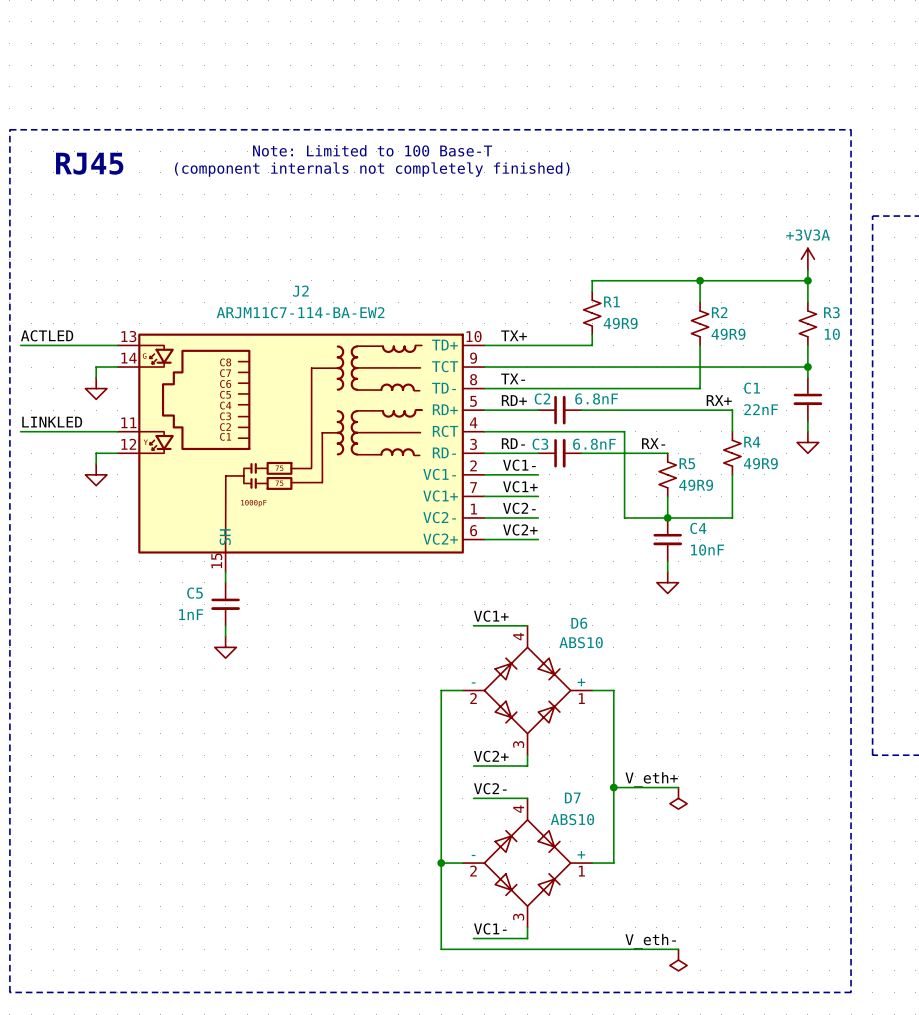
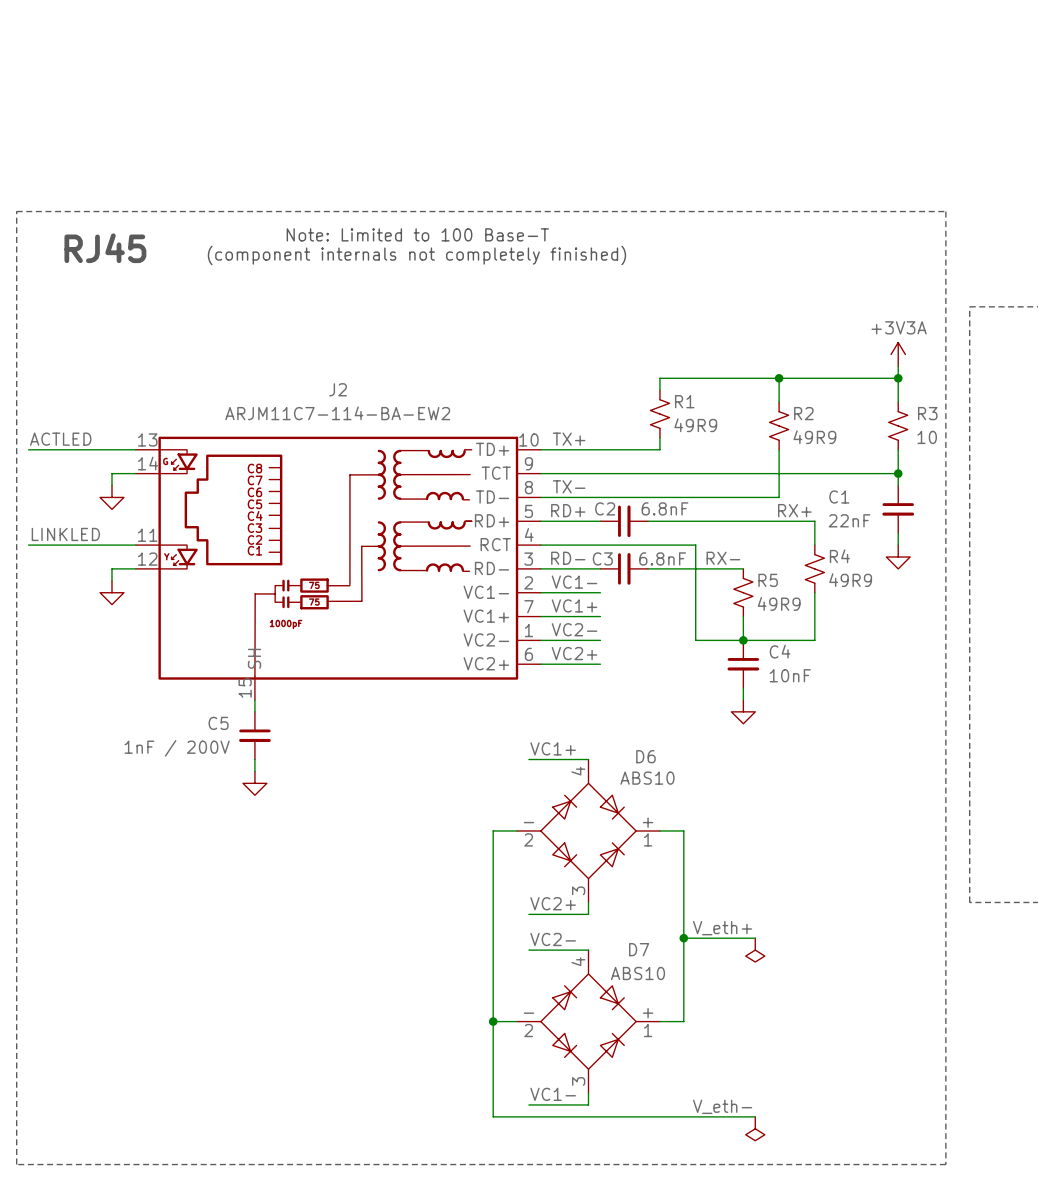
C5 value: 1nF (191, 614) -> 1nF / 200V (177, 748)

